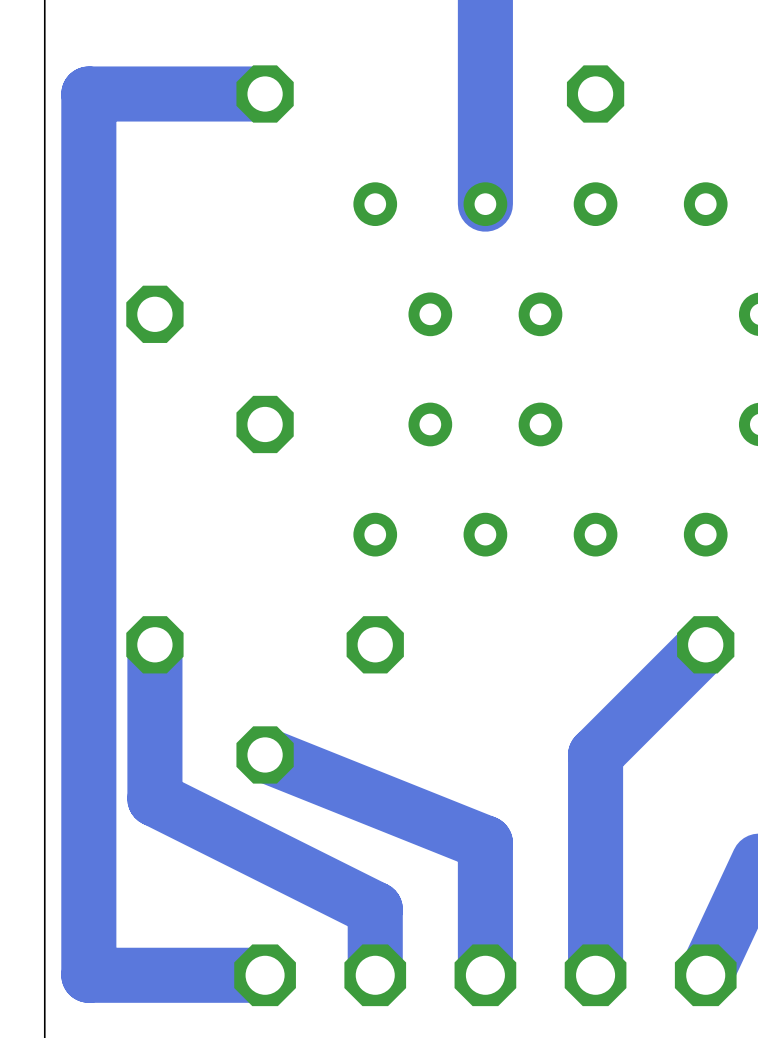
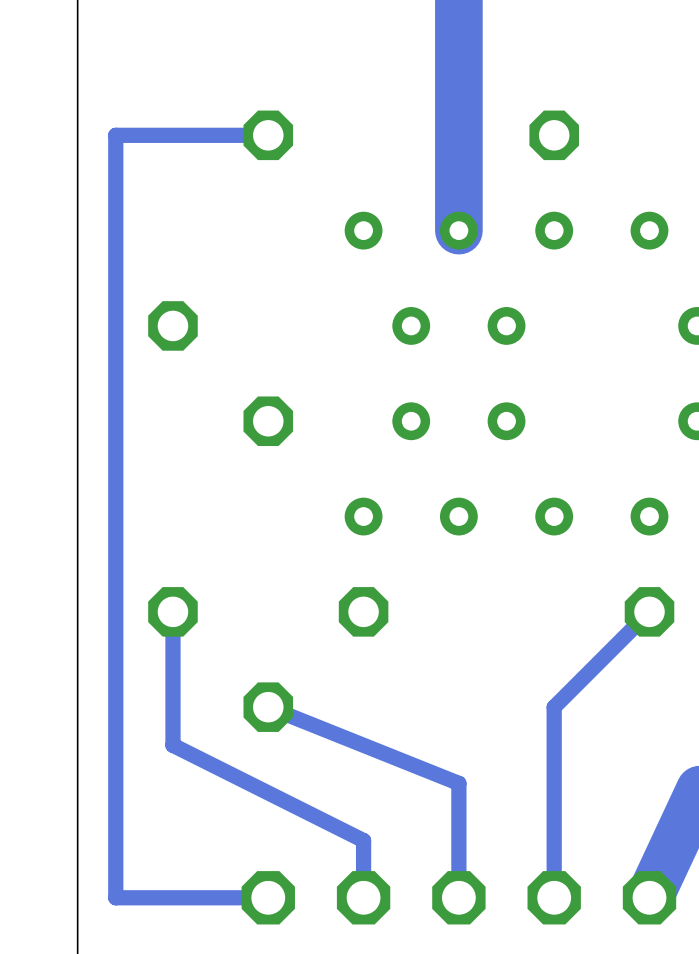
track width: thick (265, 94) (88, 94) (88, 975) (265, 975) -> thin (268, 135) (115, 135) (115, 897) (268, 897)
track width: thick (154, 644) (154, 799) (375, 909) (375, 975) -> thin (172, 611) (172, 745) (363, 840) (363, 897)
track width: thick (705, 644) (595, 754) (595, 975) -> thin (649, 611) (554, 707) (554, 897)
track width: thick (265, 754) (485, 843) (485, 975) -> thin (268, 707) (458, 783) (458, 897)

